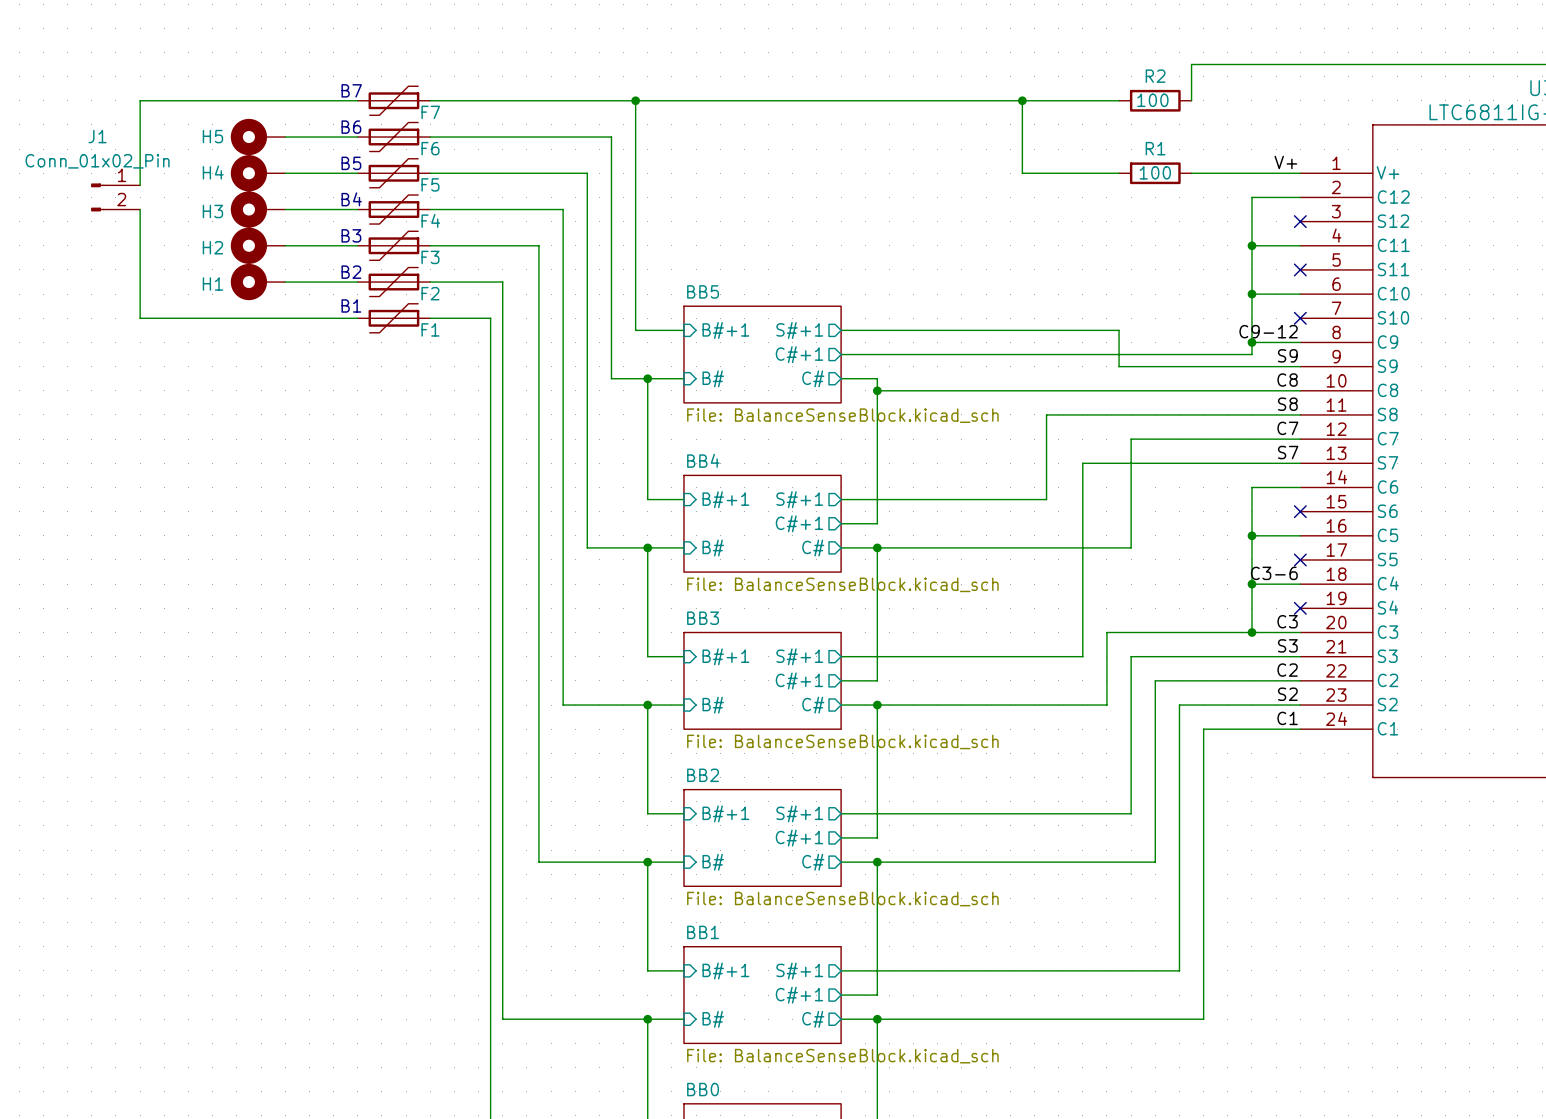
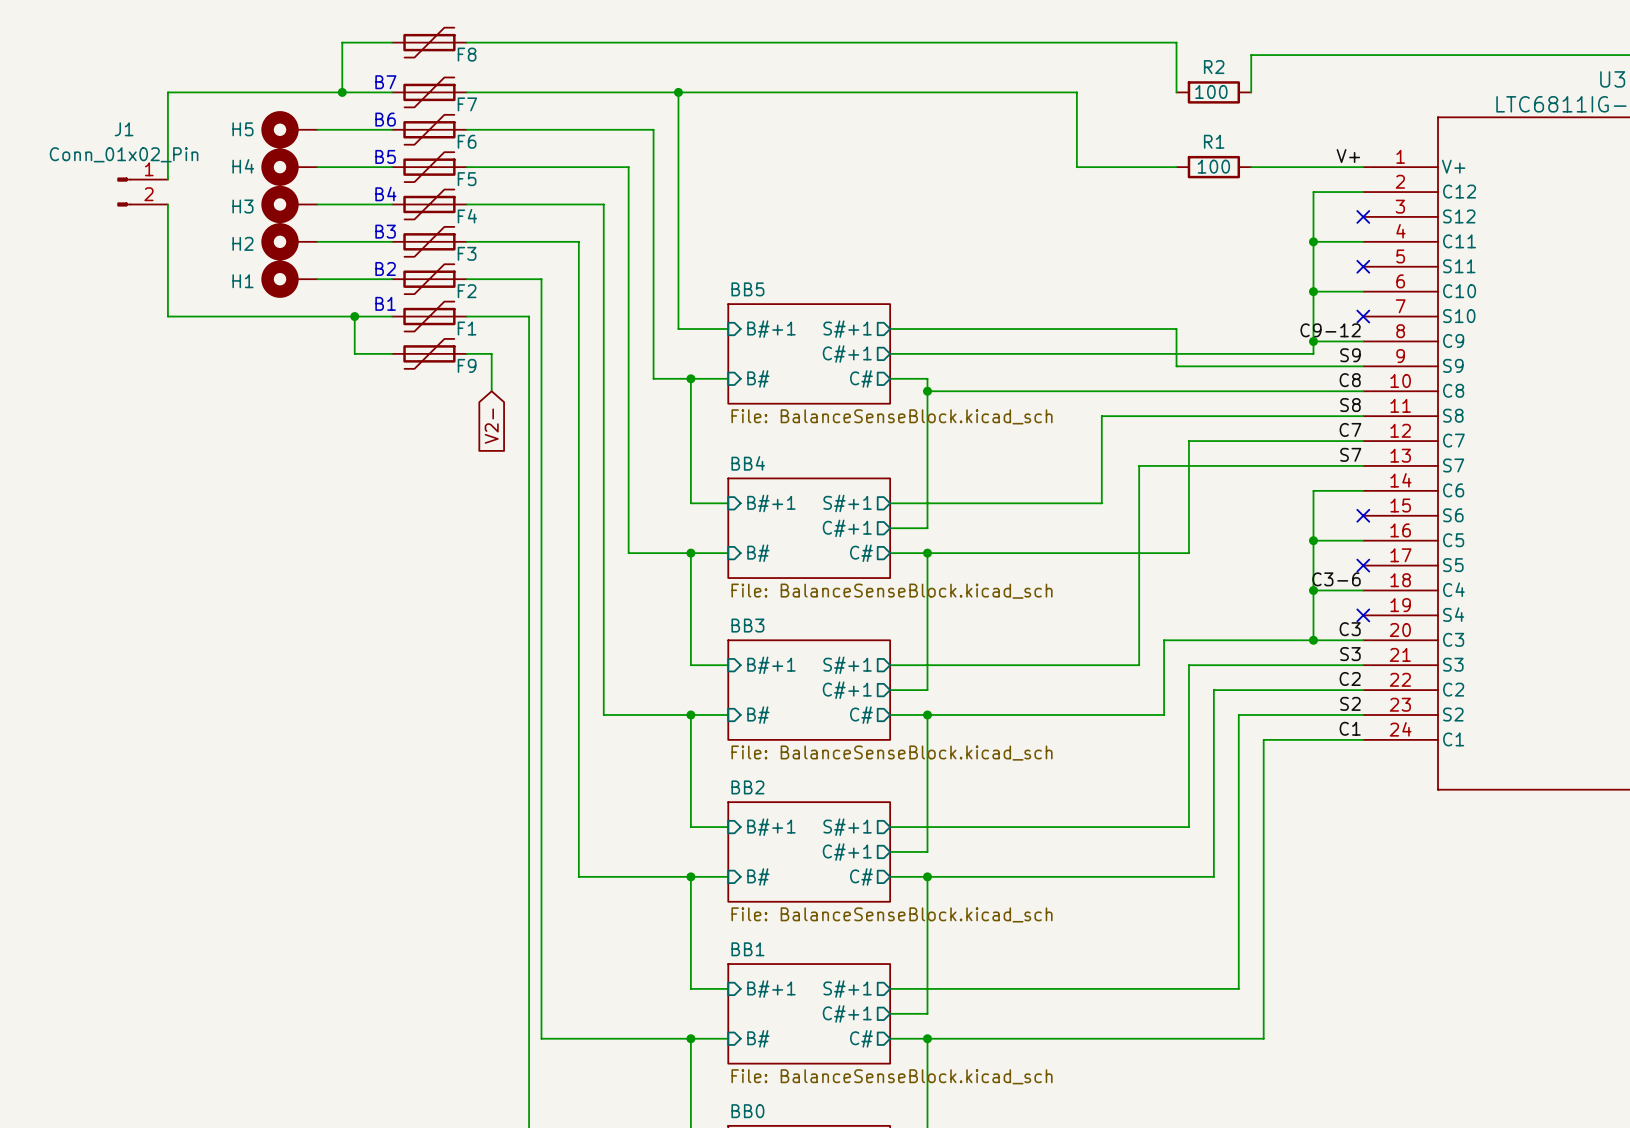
wire: none -> (392, 42) (342, 42) (342, 92)
F8: none -> (429, 42)
junction: none -> (342, 92)
wire: (1022, 100) (1119, 100) -> (466, 42) (1176, 42) (1176, 92)
junction: (1022, 100) -> none
wire: none -> (354, 316) (354, 353) (392, 353)
junction: none -> (354, 316)
F9: none -> (429, 353)
wire: none -> (466, 353) (491, 353) (491, 391)
global label: none -> V2- (491, 426)

